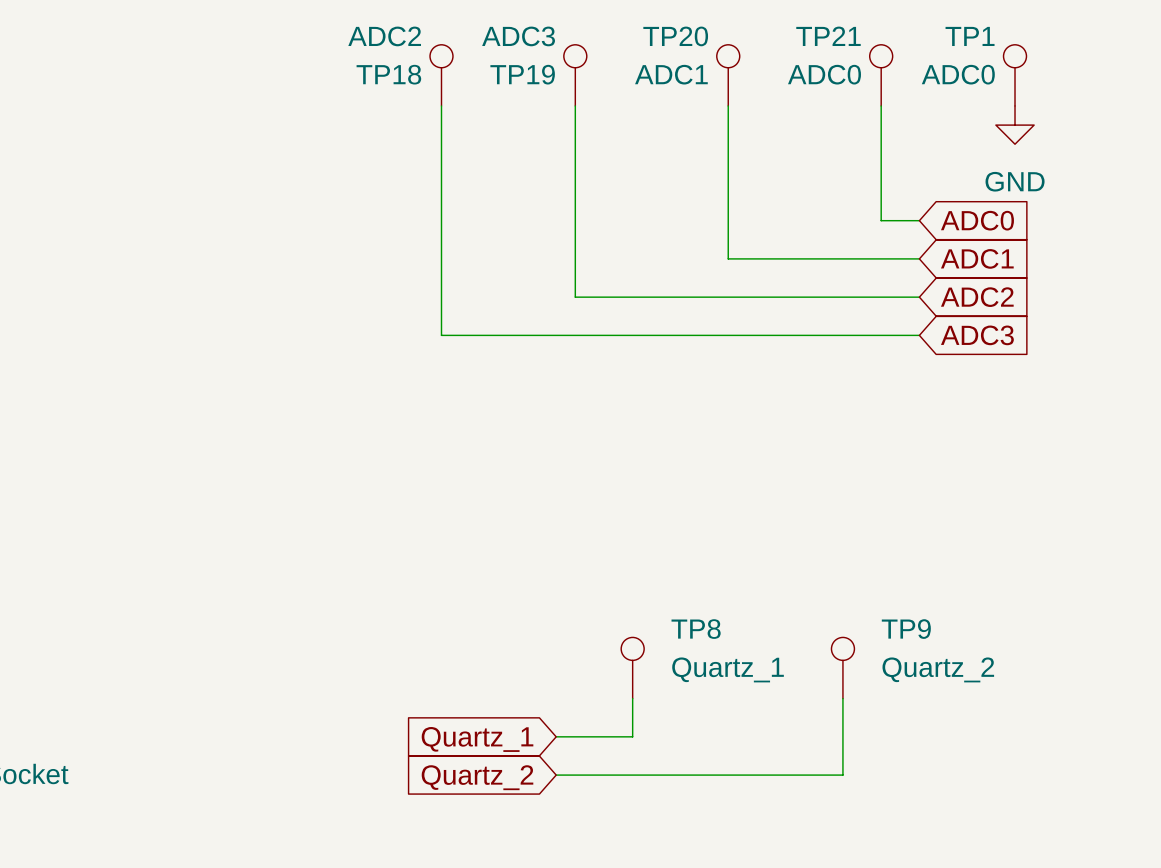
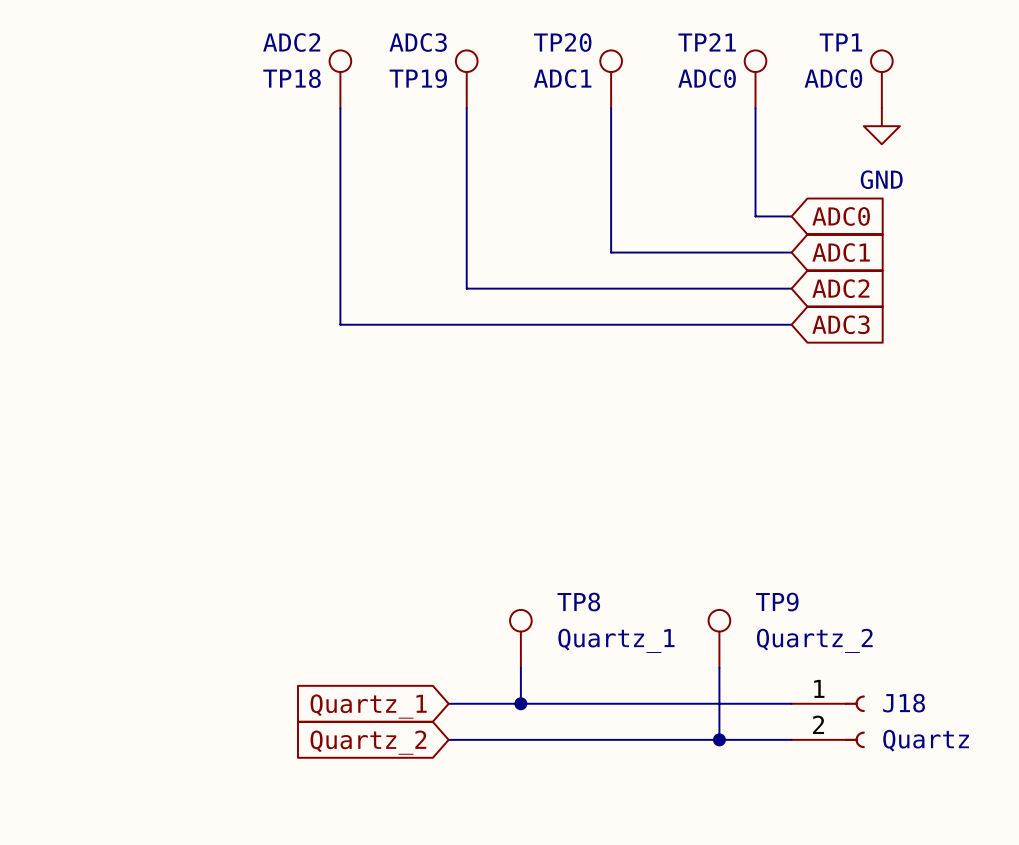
wire: none -> (520, 703) (791, 703)
junction: none -> (520, 703)
J18: none -> Quartz (828, 721)
wire: none -> (719, 739) (791, 739)
junction: none -> (719, 739)

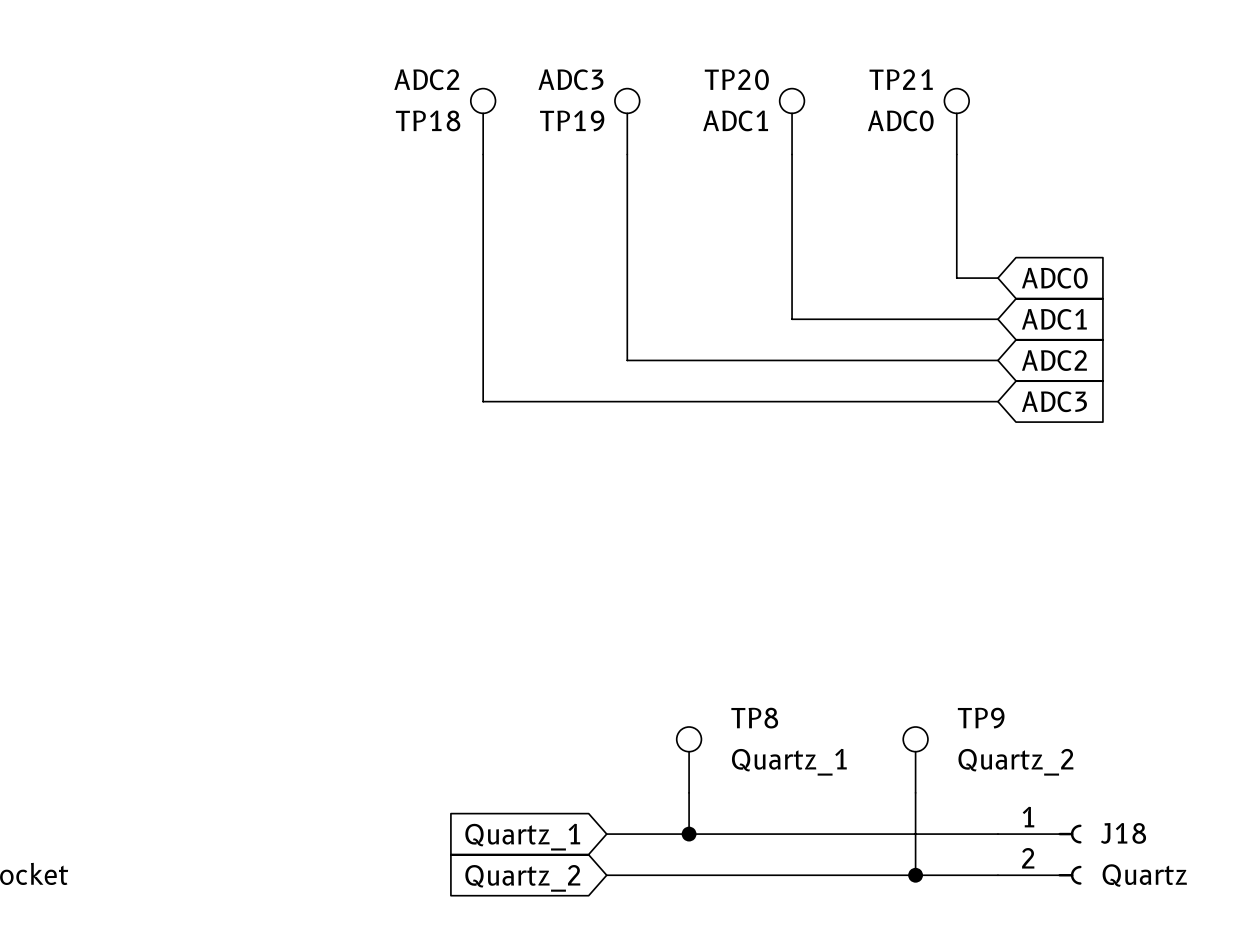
TP1: ADC0 (881, 79) -> none
power symbol: GND (881, 126) -> none

